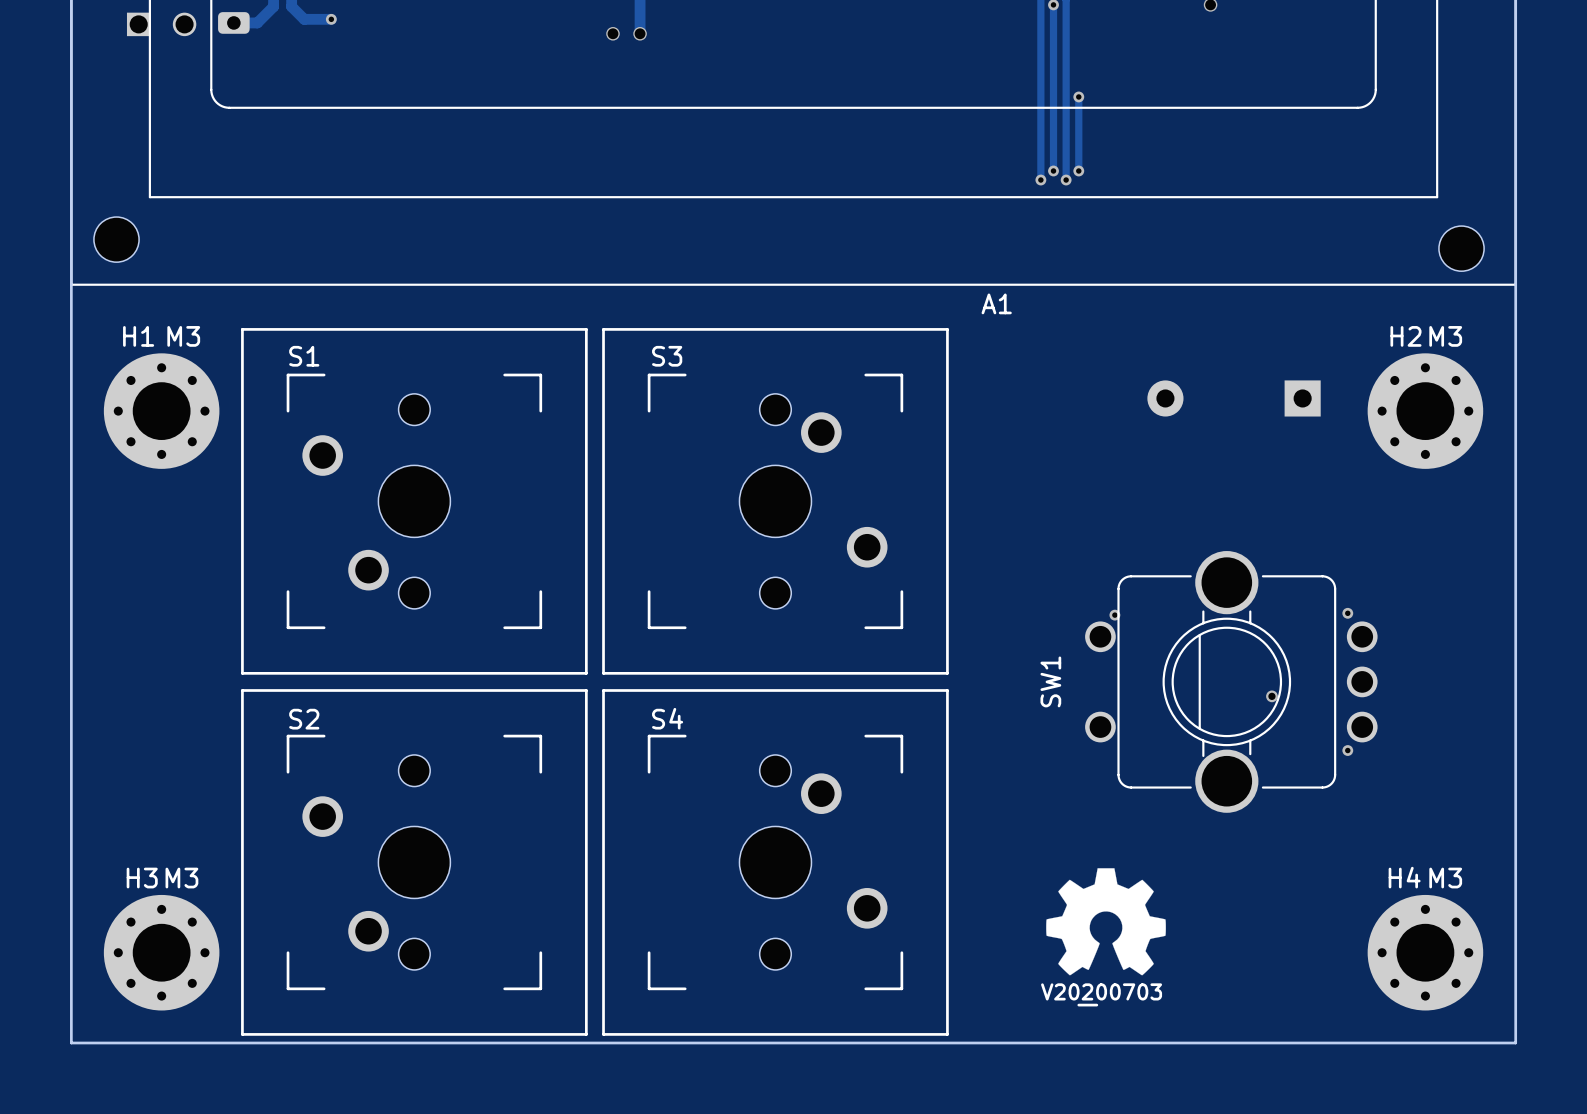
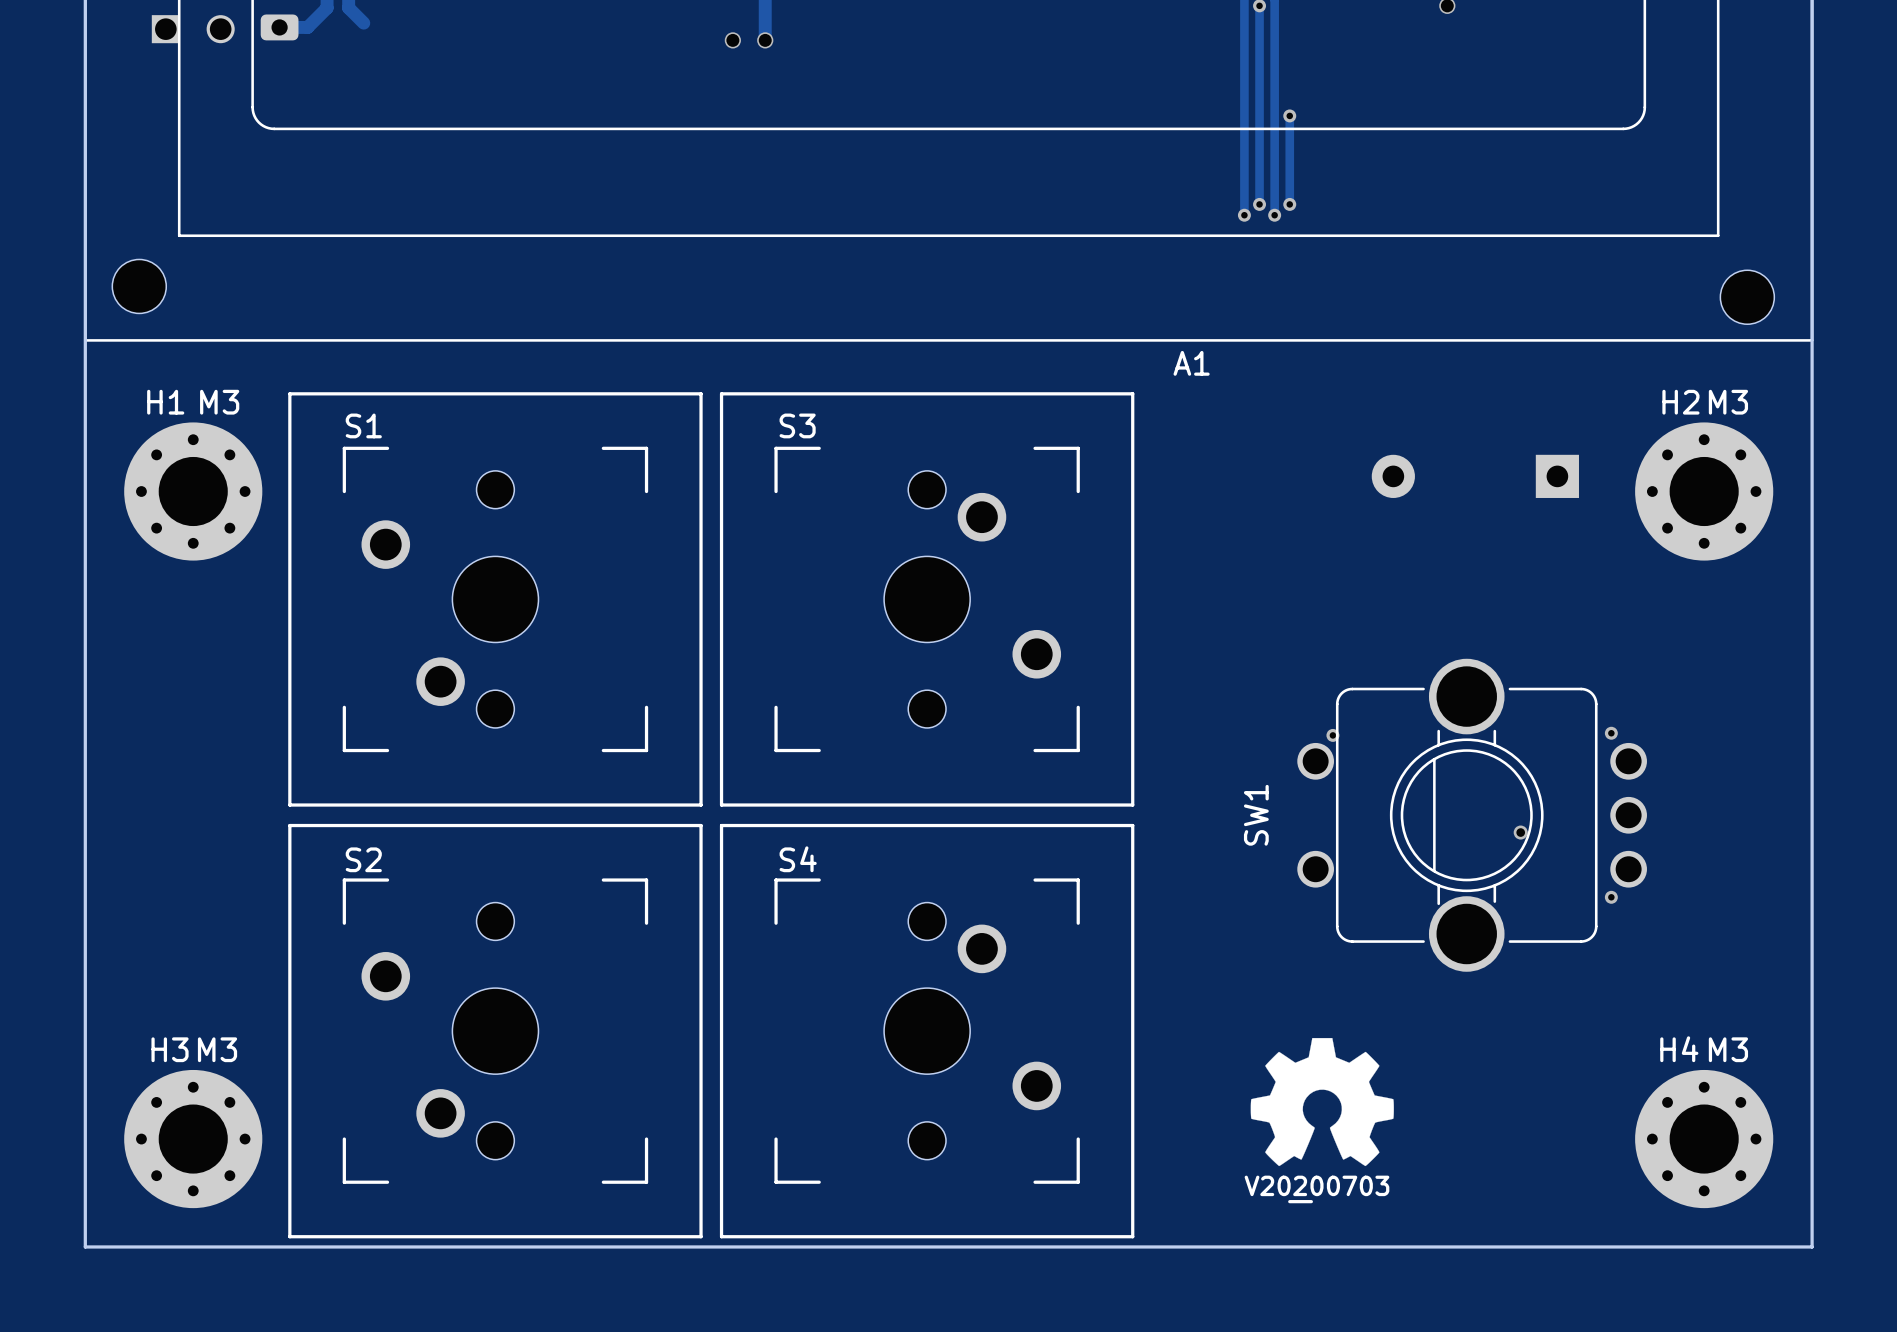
track: (304, 19) (331, 19) -> none
via: (331, 19) -> none

